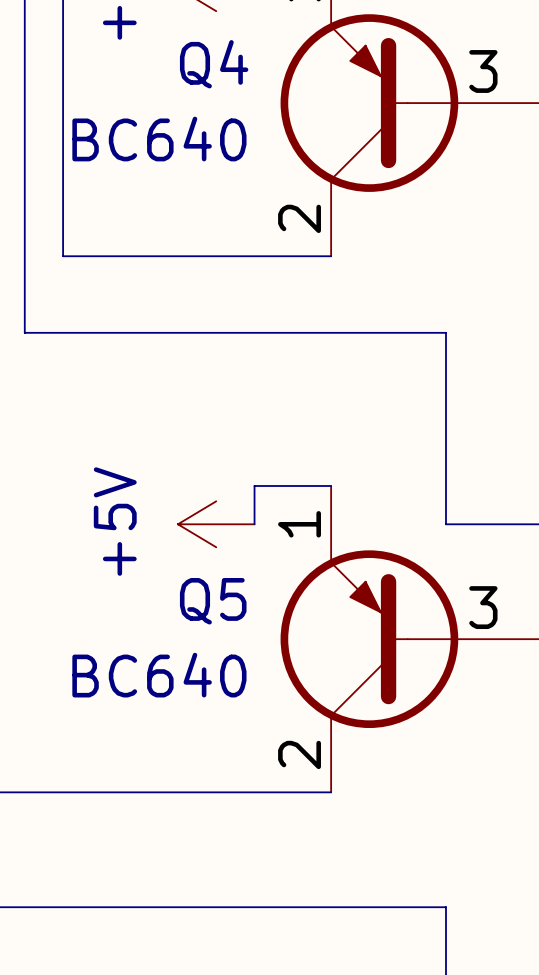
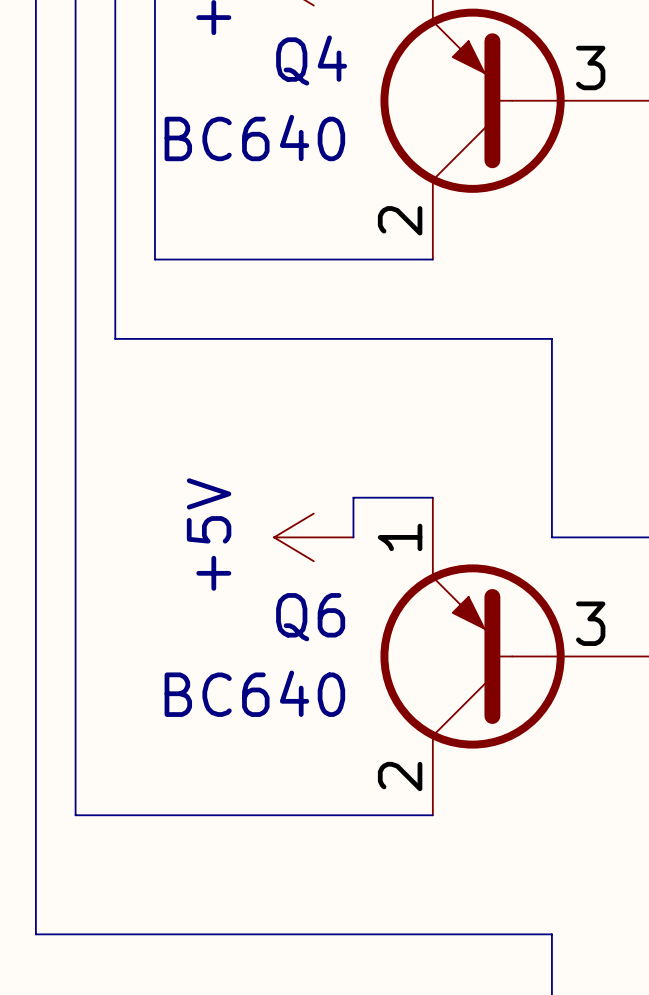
Q5 name: Q5 (213, 601) -> Q6 (310, 617)

